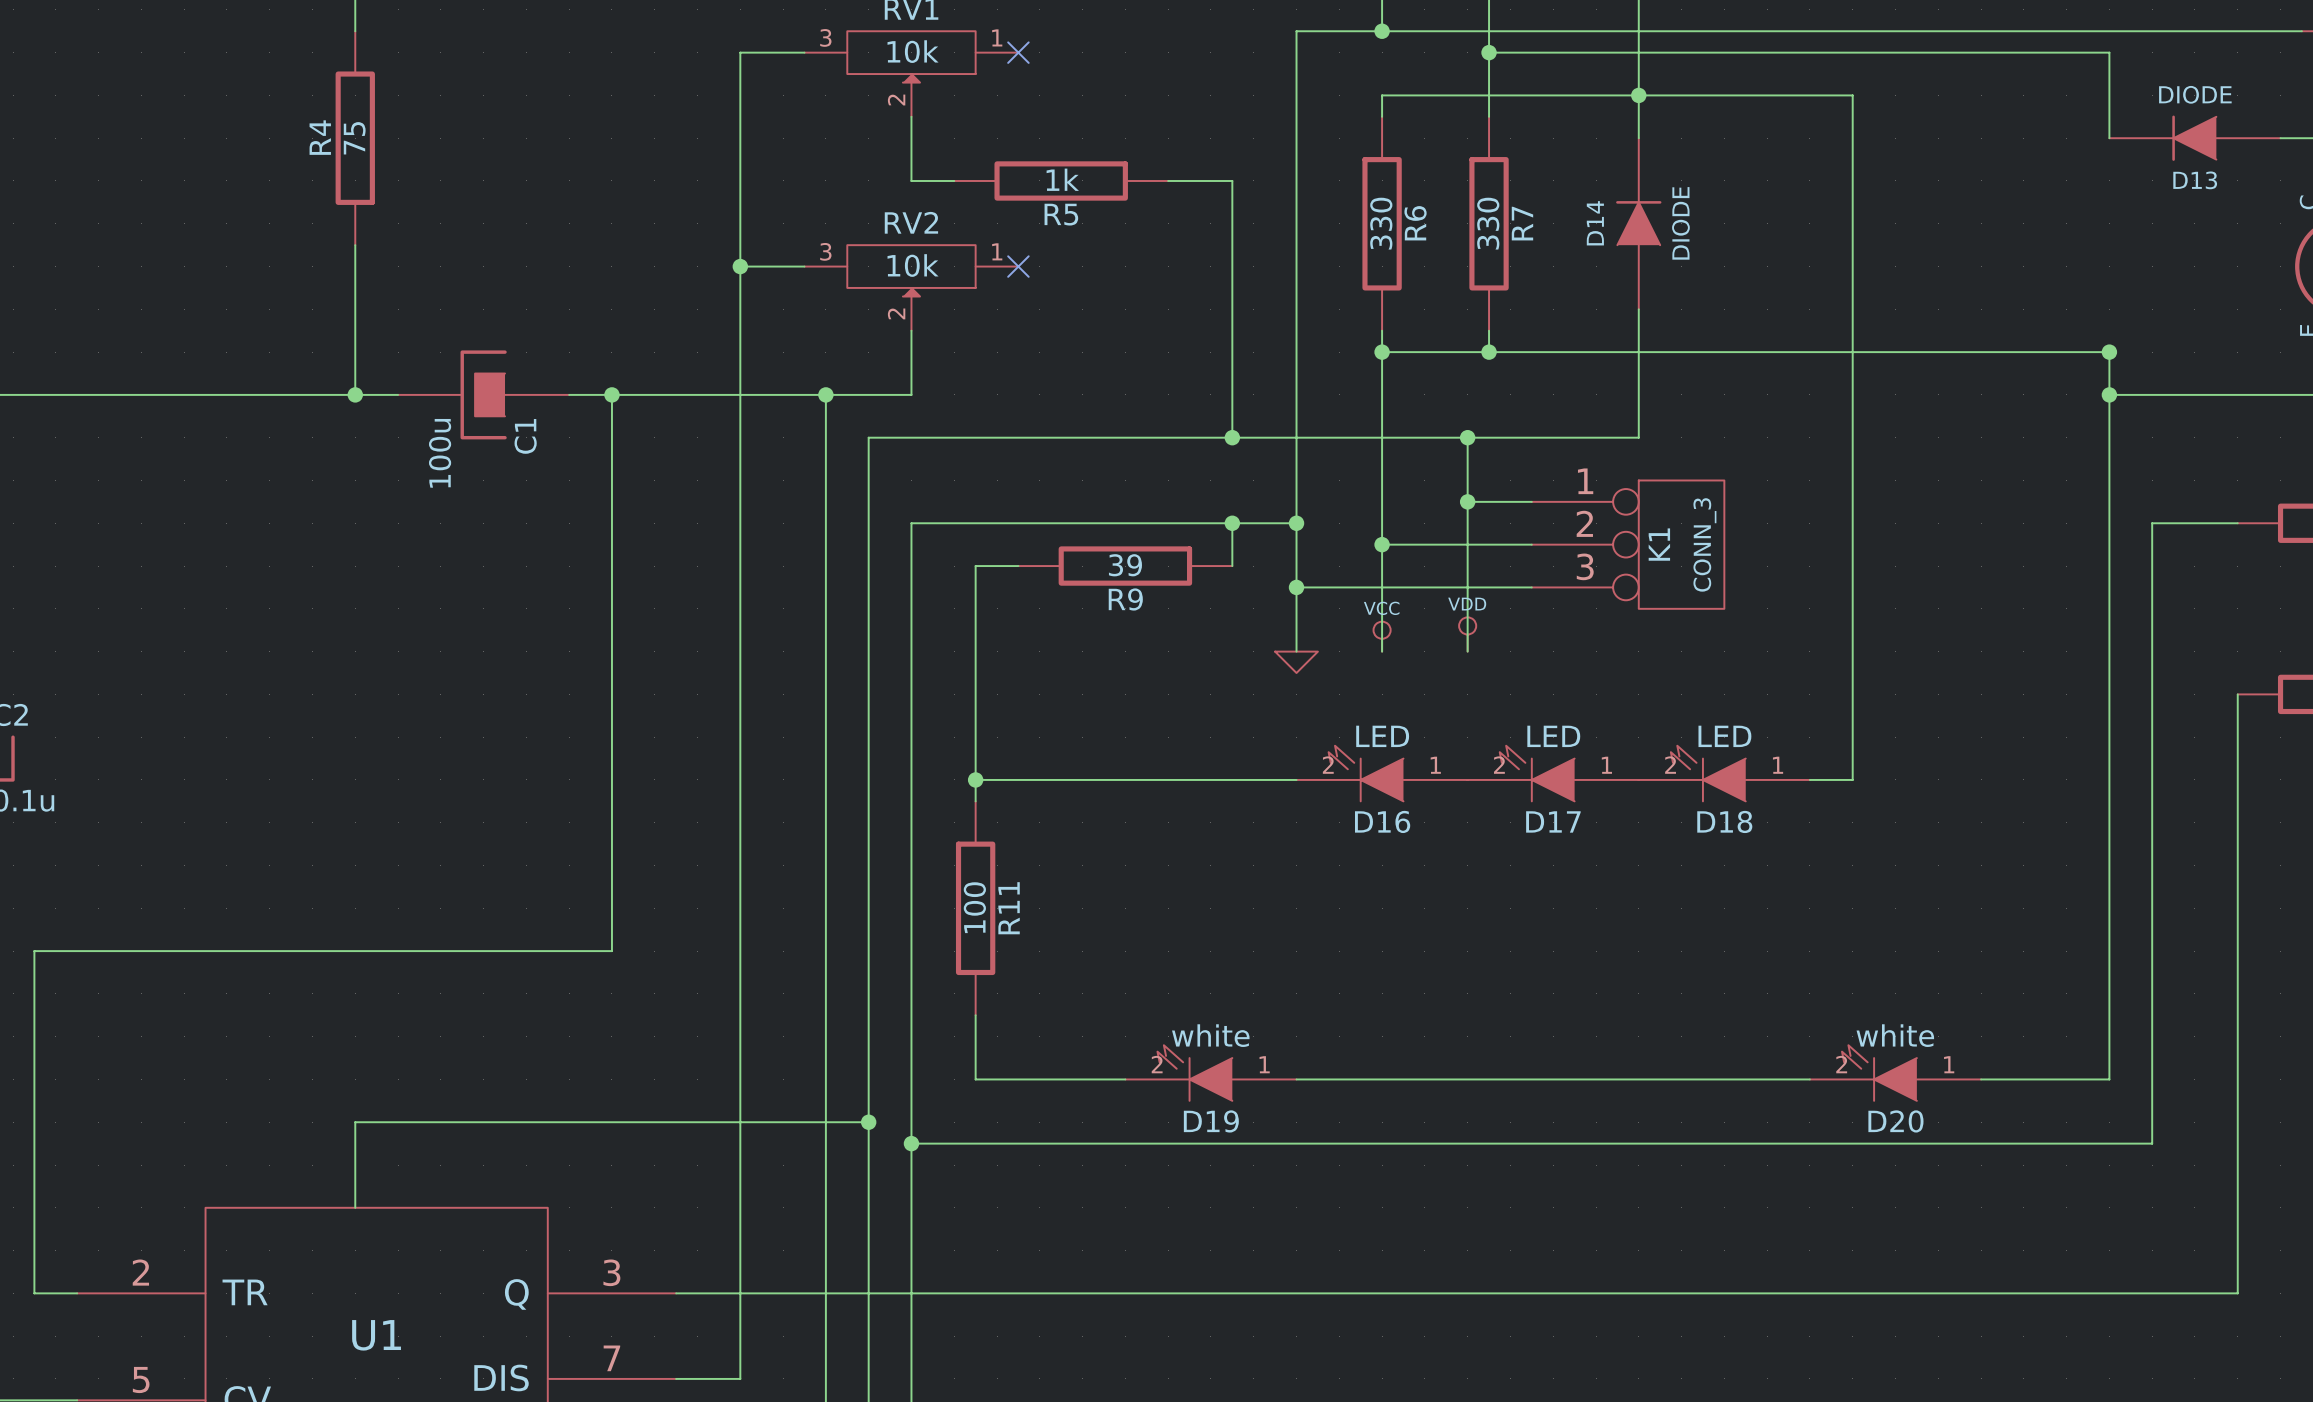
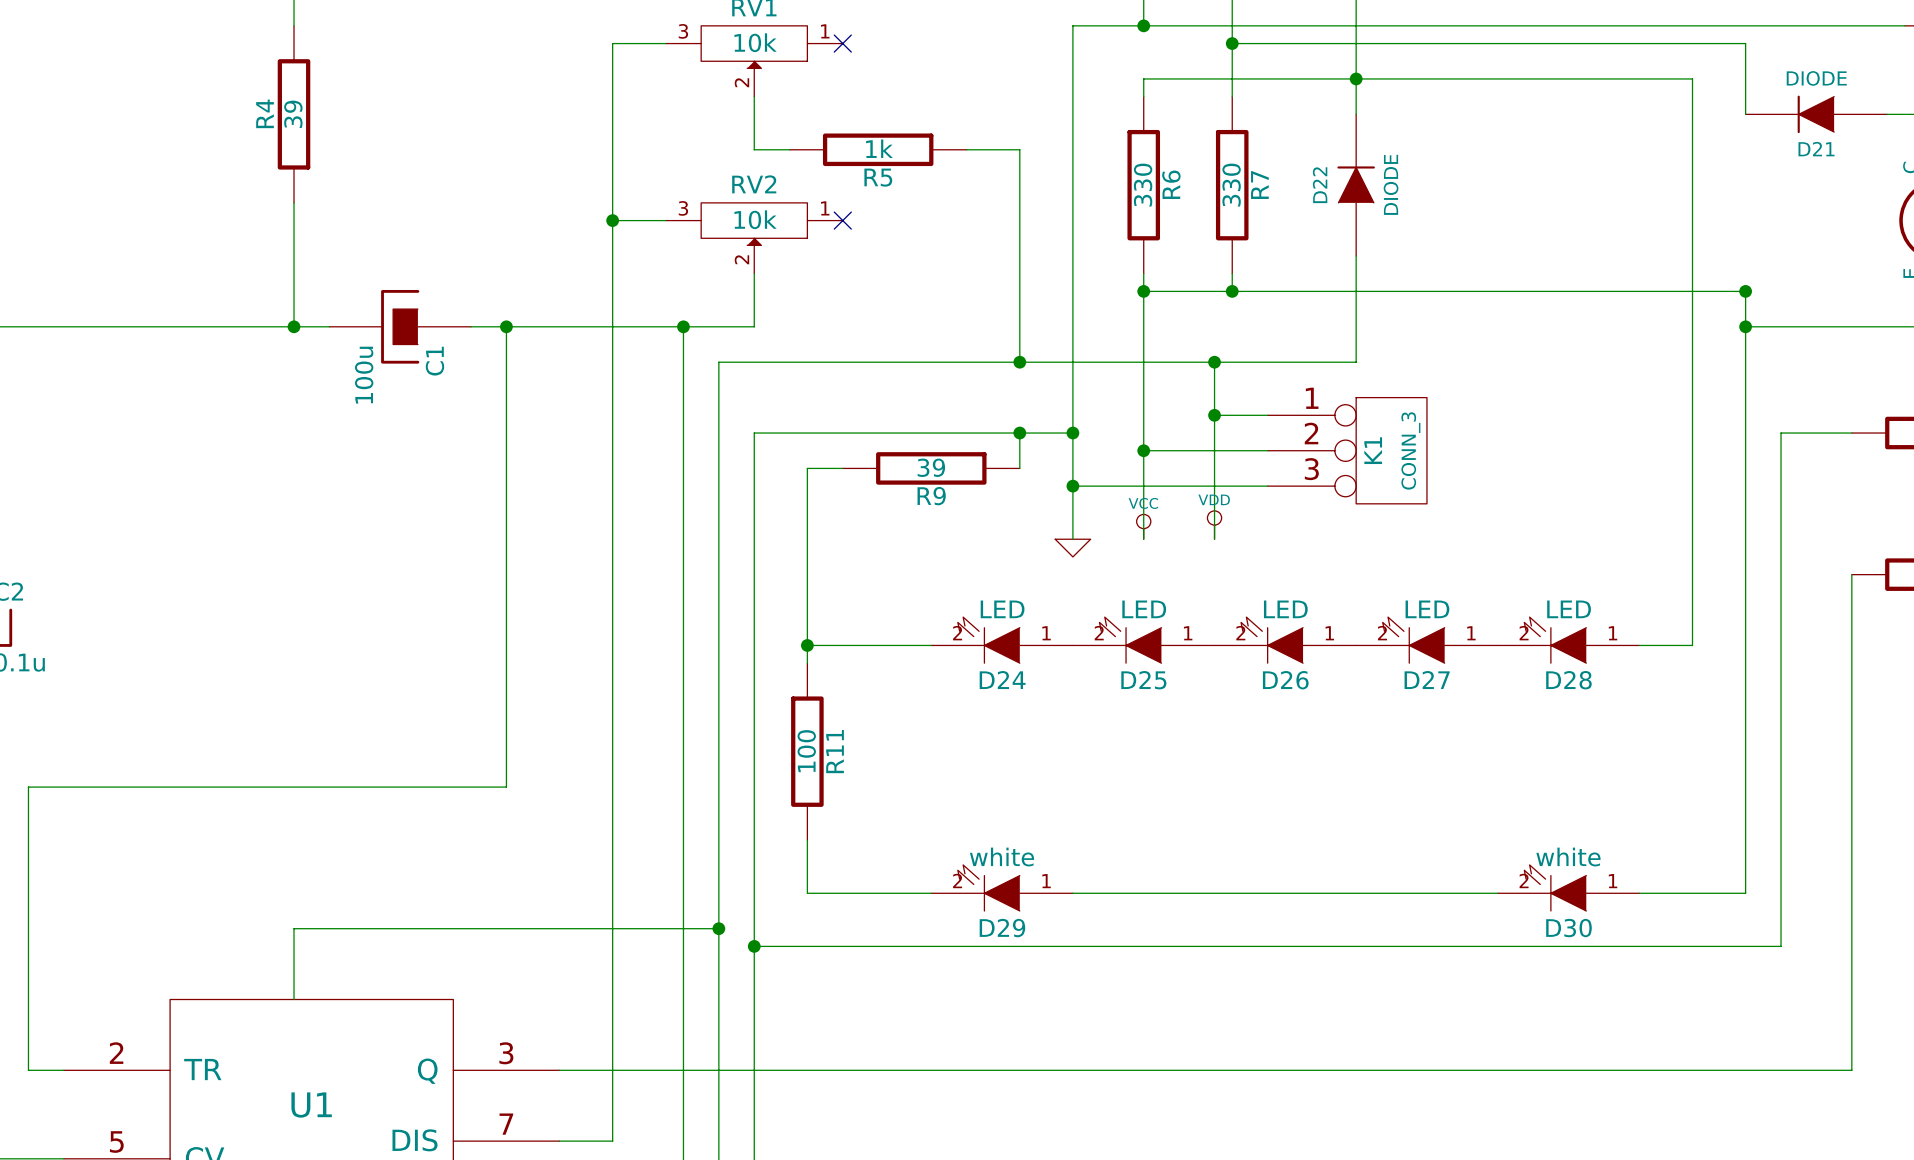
wire: (1852, 95) (1852, 779) (1809, 779) -> (1533, 78) (1692, 78) (1692, 645) (1639, 645)
R4 value: 75 (354, 138) -> 39 (293, 114)
D13 name: D13 (2195, 180) -> D21 (1816, 149)
D14 name: D14 (1595, 223) -> D22 (1320, 185)
D24: none -> LED (1002, 640)
D28: none -> LED (1568, 640)
D16 name: D16 (1382, 821) -> D25 (1143, 680)
D17 name: D17 (1553, 821) -> D26 (1285, 680)
D18 name: D18 (1724, 821) -> D27 (1427, 680)
D19 name: D19 (1211, 1121) -> D29 (1002, 928)
D20 name: D20 (1895, 1121) -> D30 (1568, 928)

